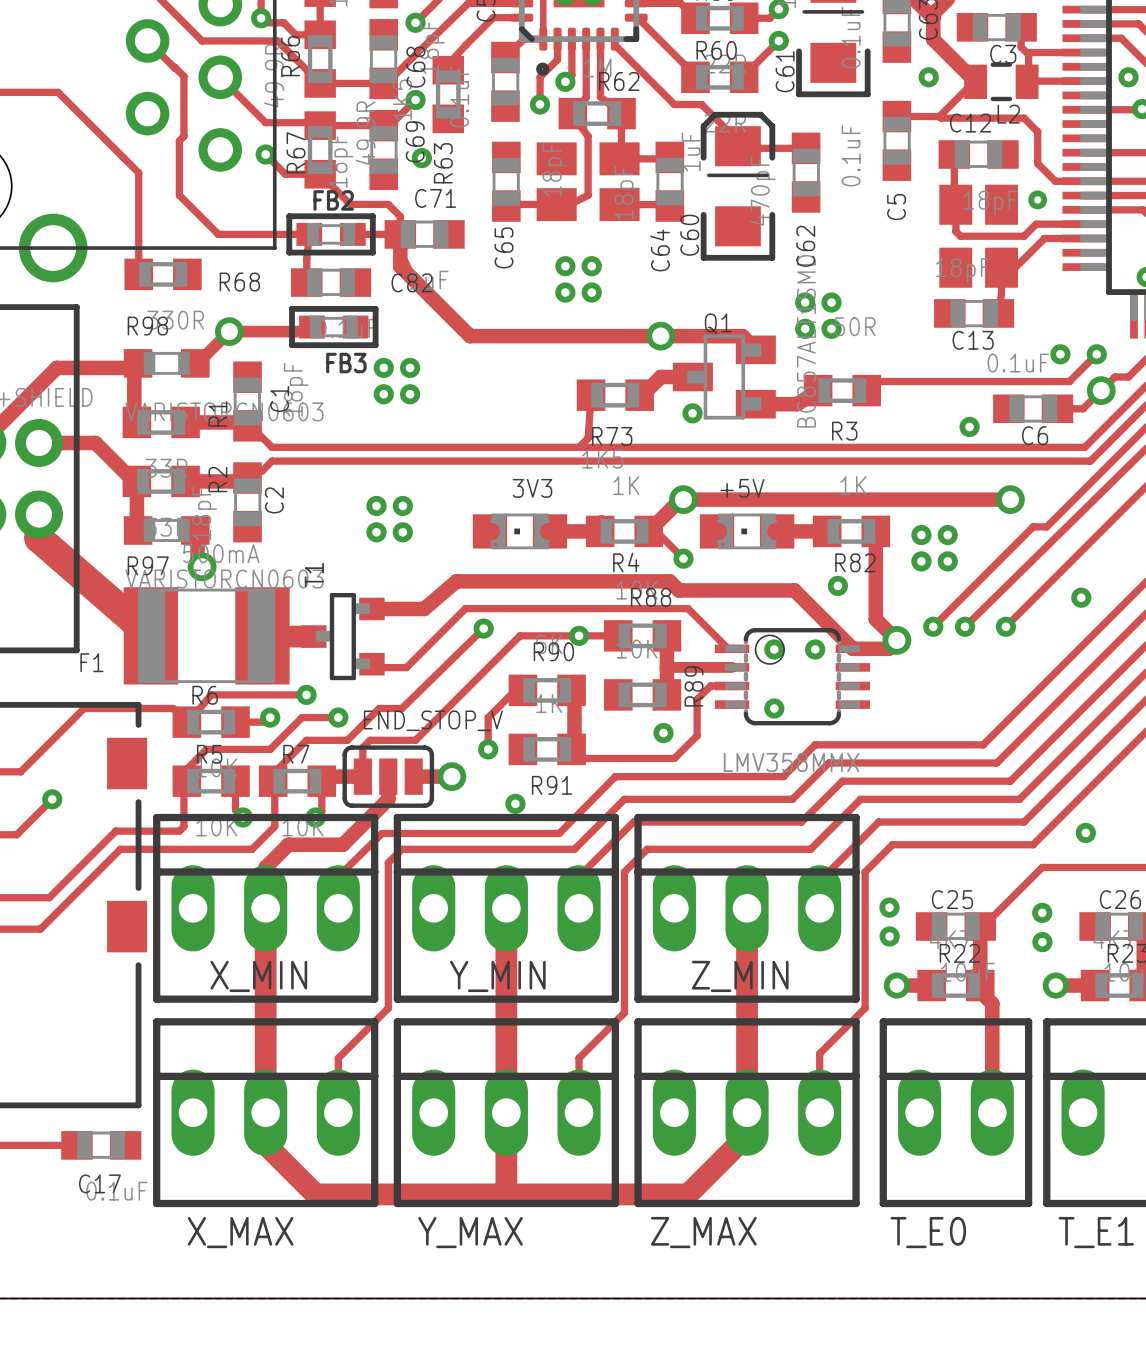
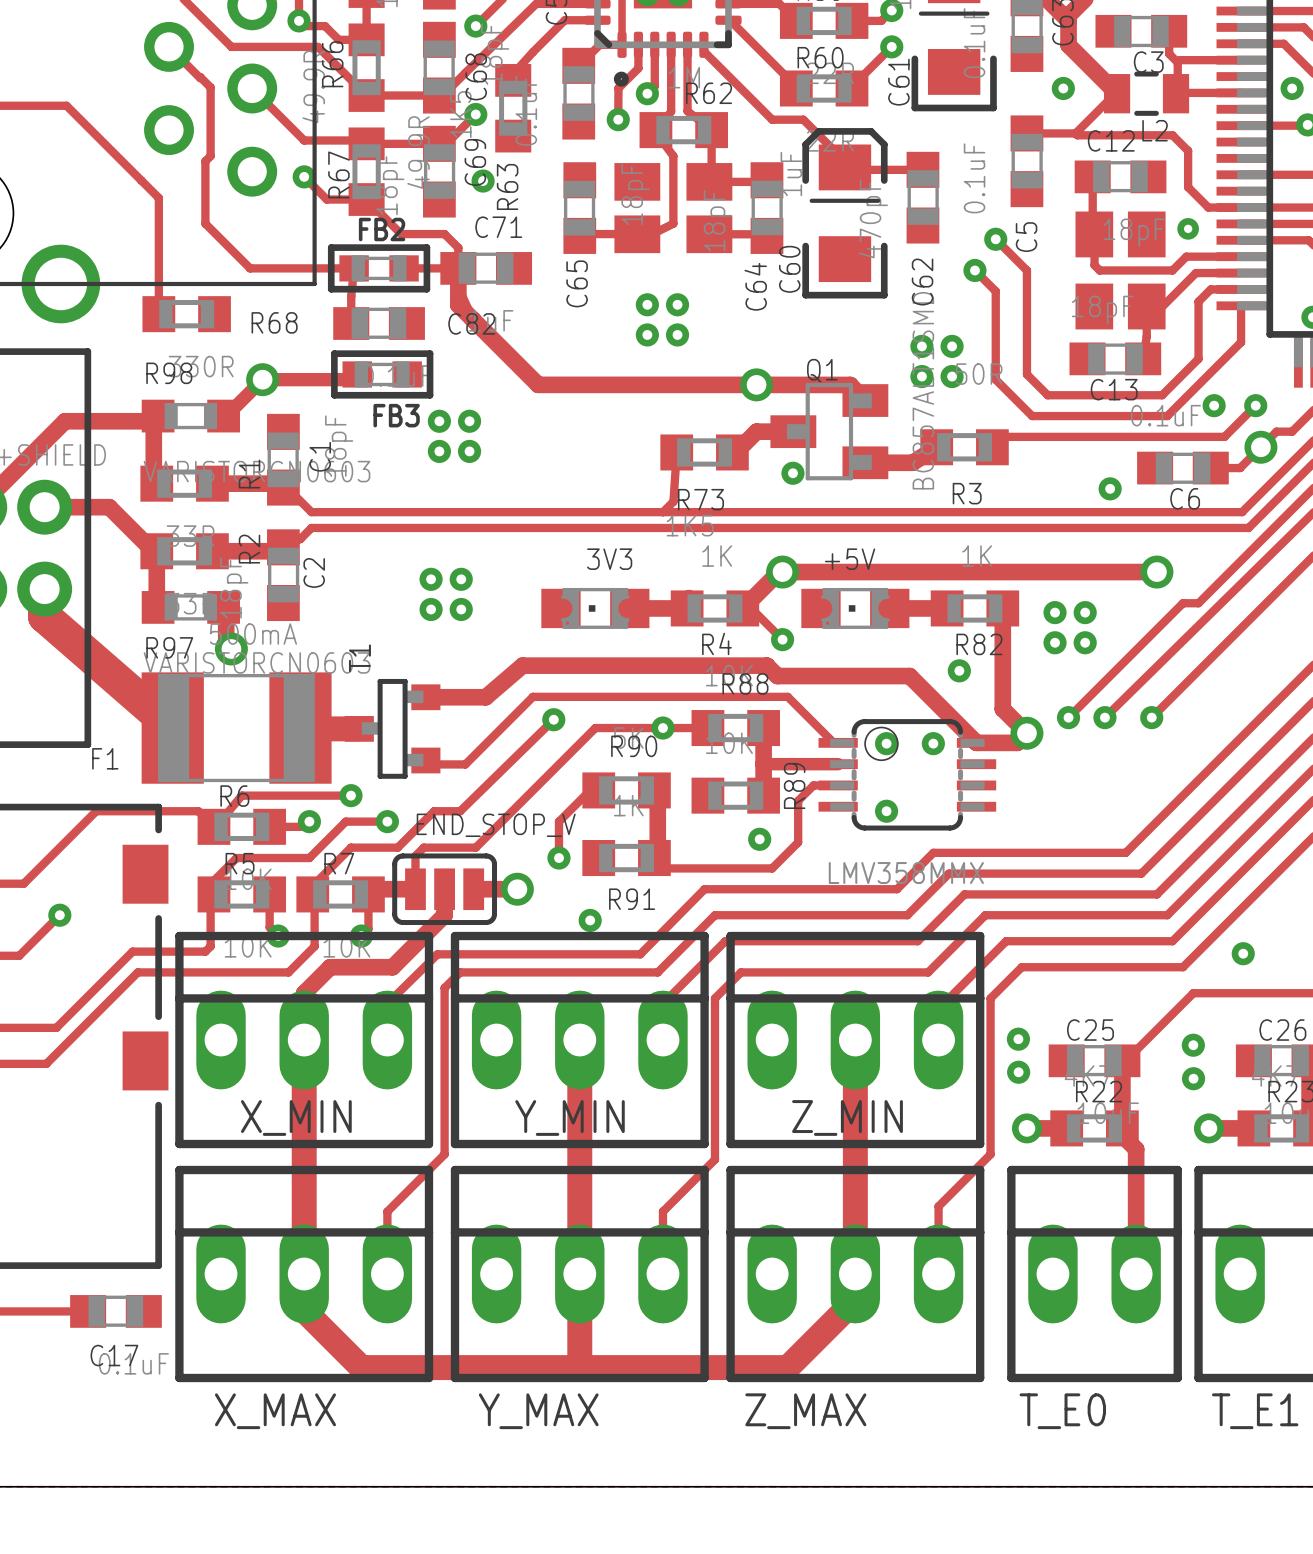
track: none -> (995, 239) (1026, 270) (1026, 374) (1047, 395) (1162, 395) (1198, 358) (1198, 301) (1210, 289) (1241, 289)
via: none -> (995, 239)
track: none -> (974, 270) (995, 291) (995, 379) (1032, 416) (1167, 416) (1241, 342) (1241, 305)
via: none -> (974, 270)
via: (1081, 597) -> none

